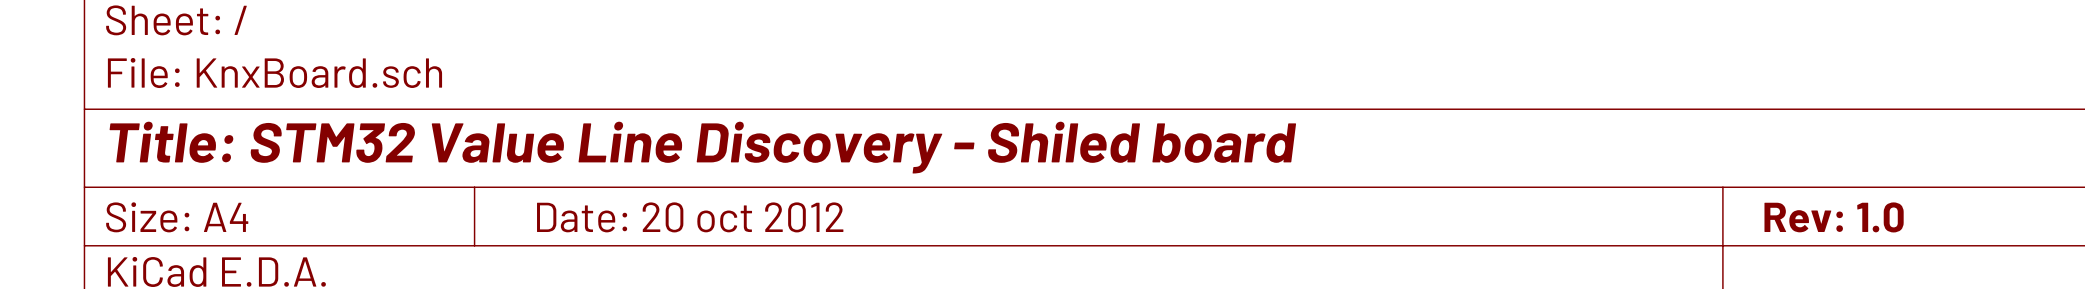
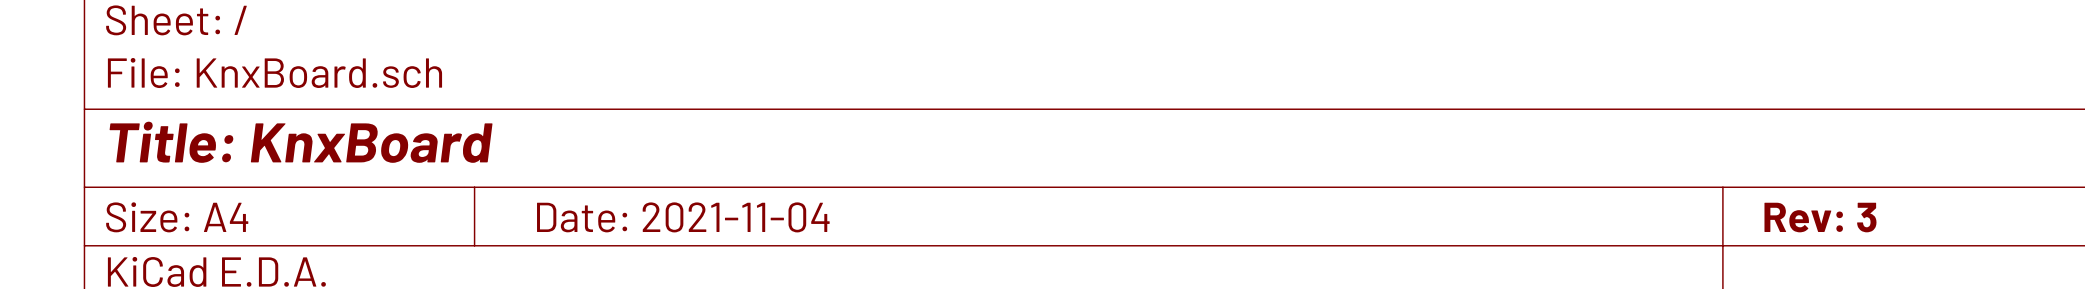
title block: Title: STM32 Value Line Discovery - Shiled board (702, 147) -> Title: KnxBoard (301, 142)
title block: Date: 20 oct 2012 (690, 217) -> Date: 2021-11-04 (683, 217)
title block: Rev: 1.0 (1834, 217) -> Rev: 3 (1820, 217)

